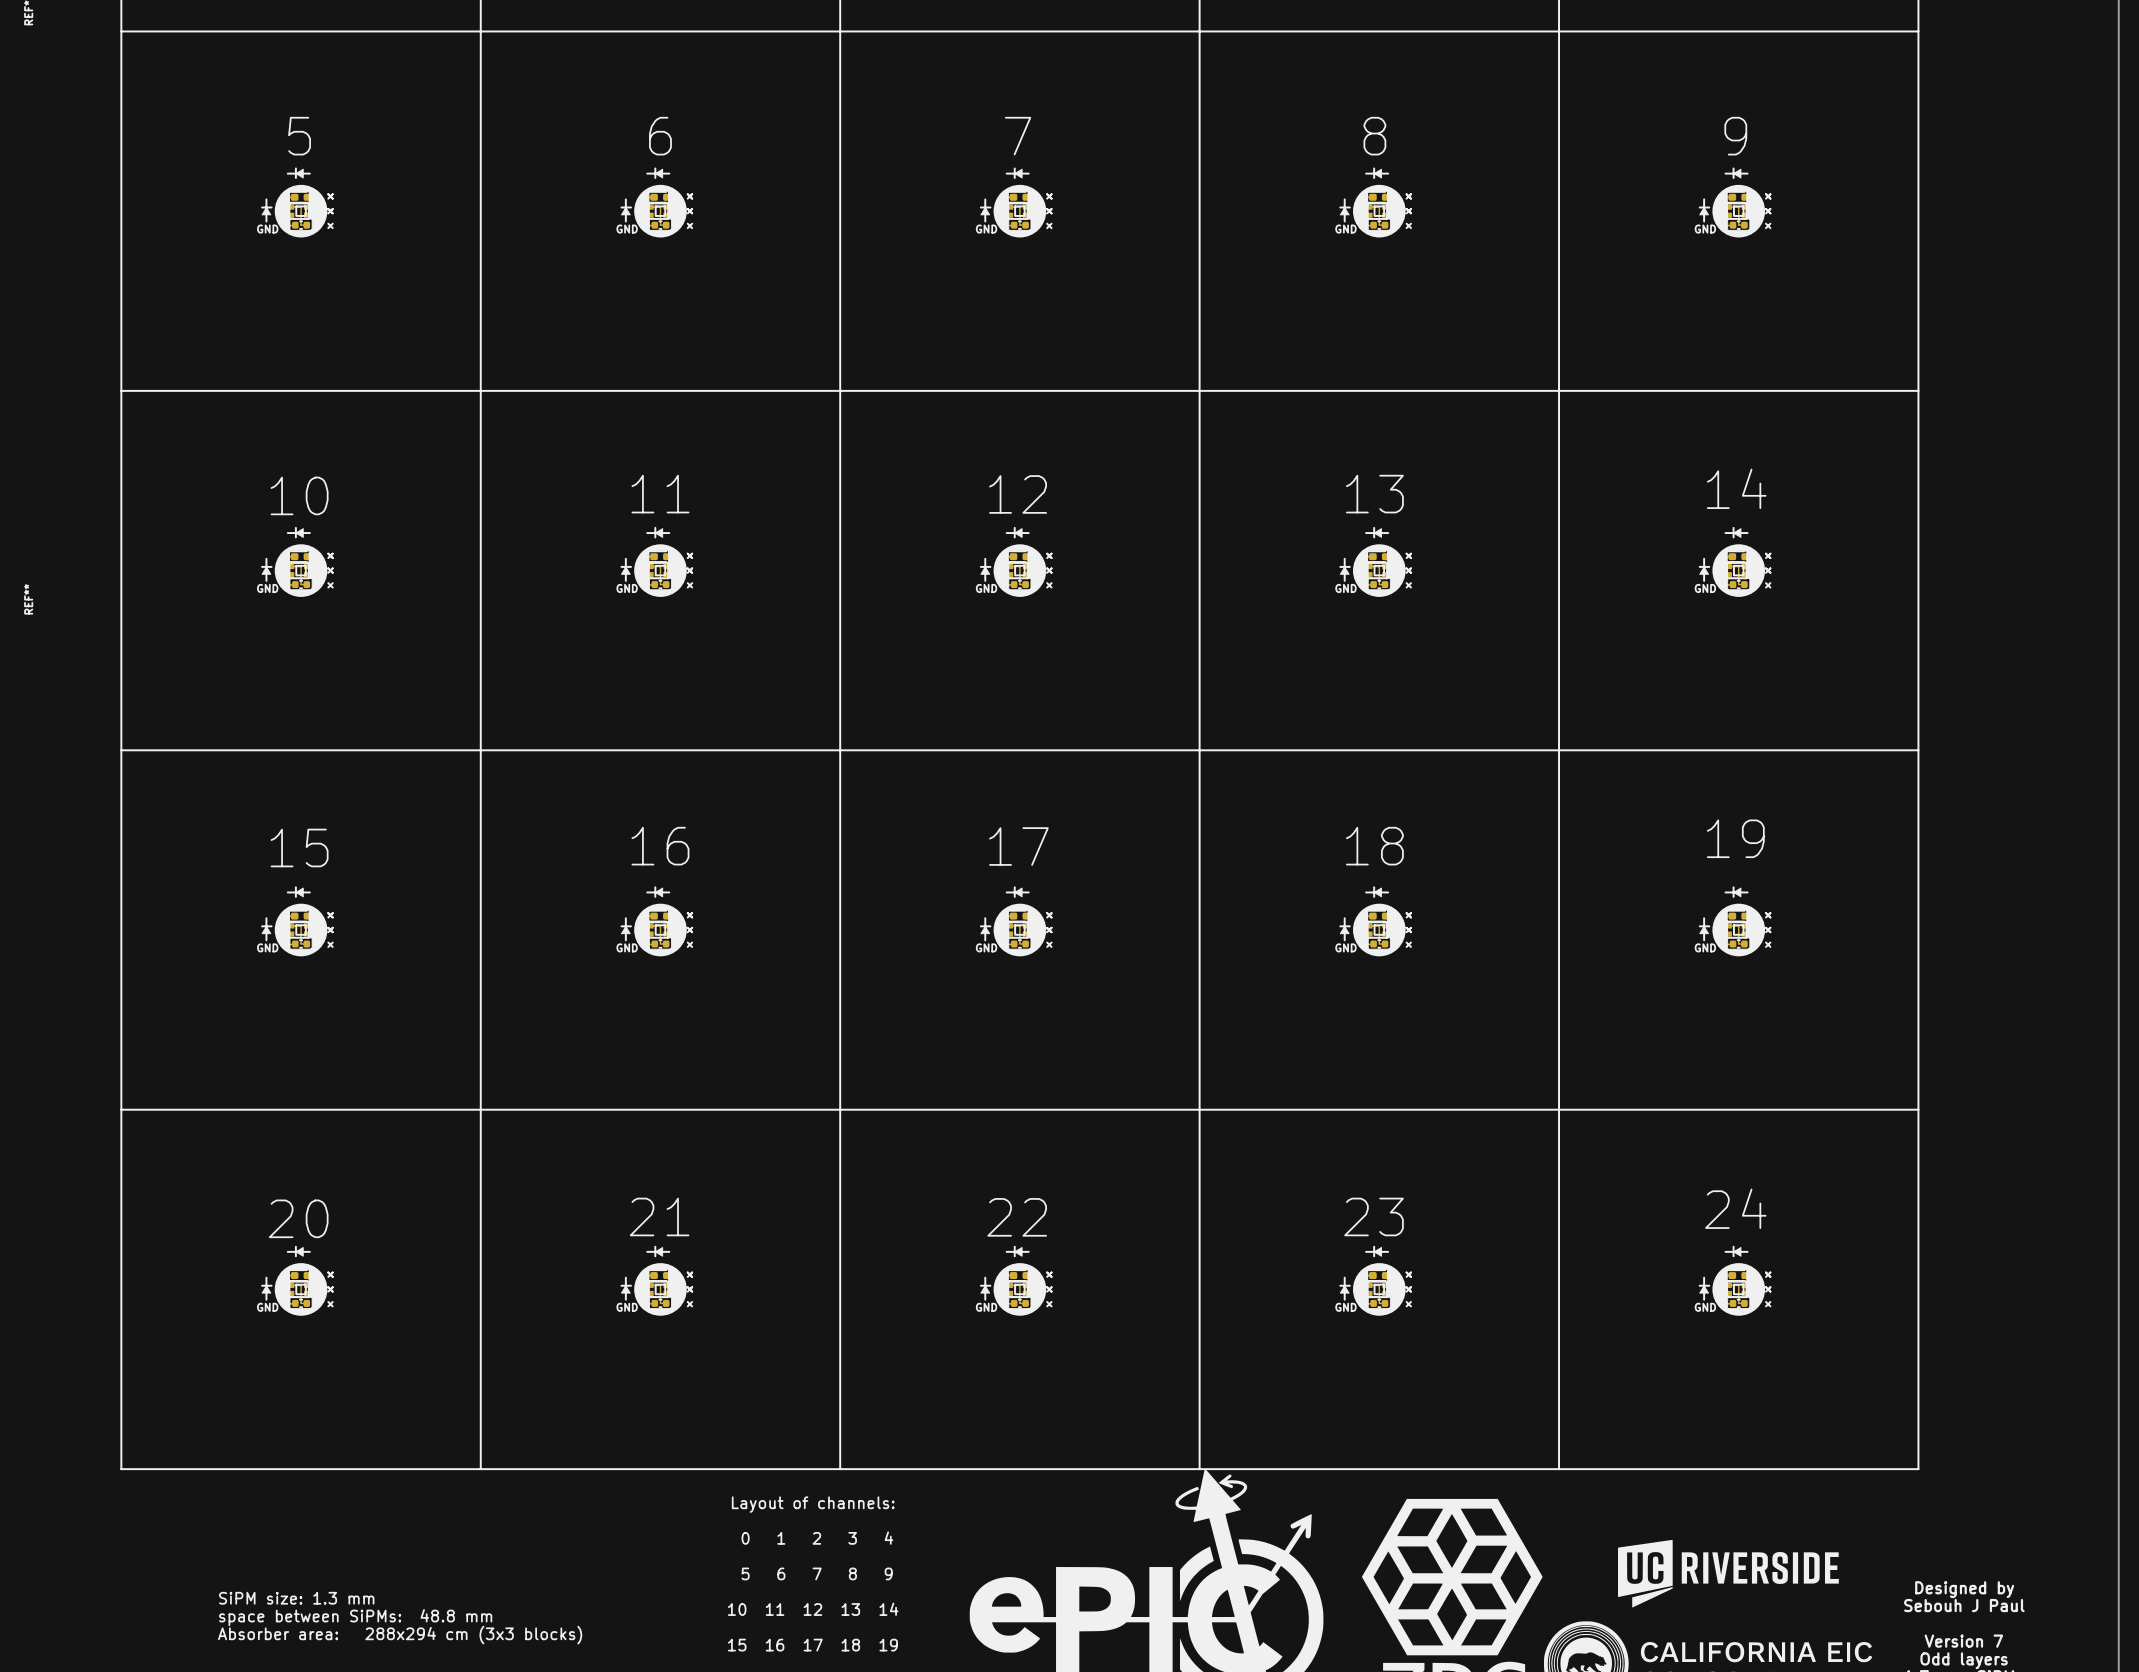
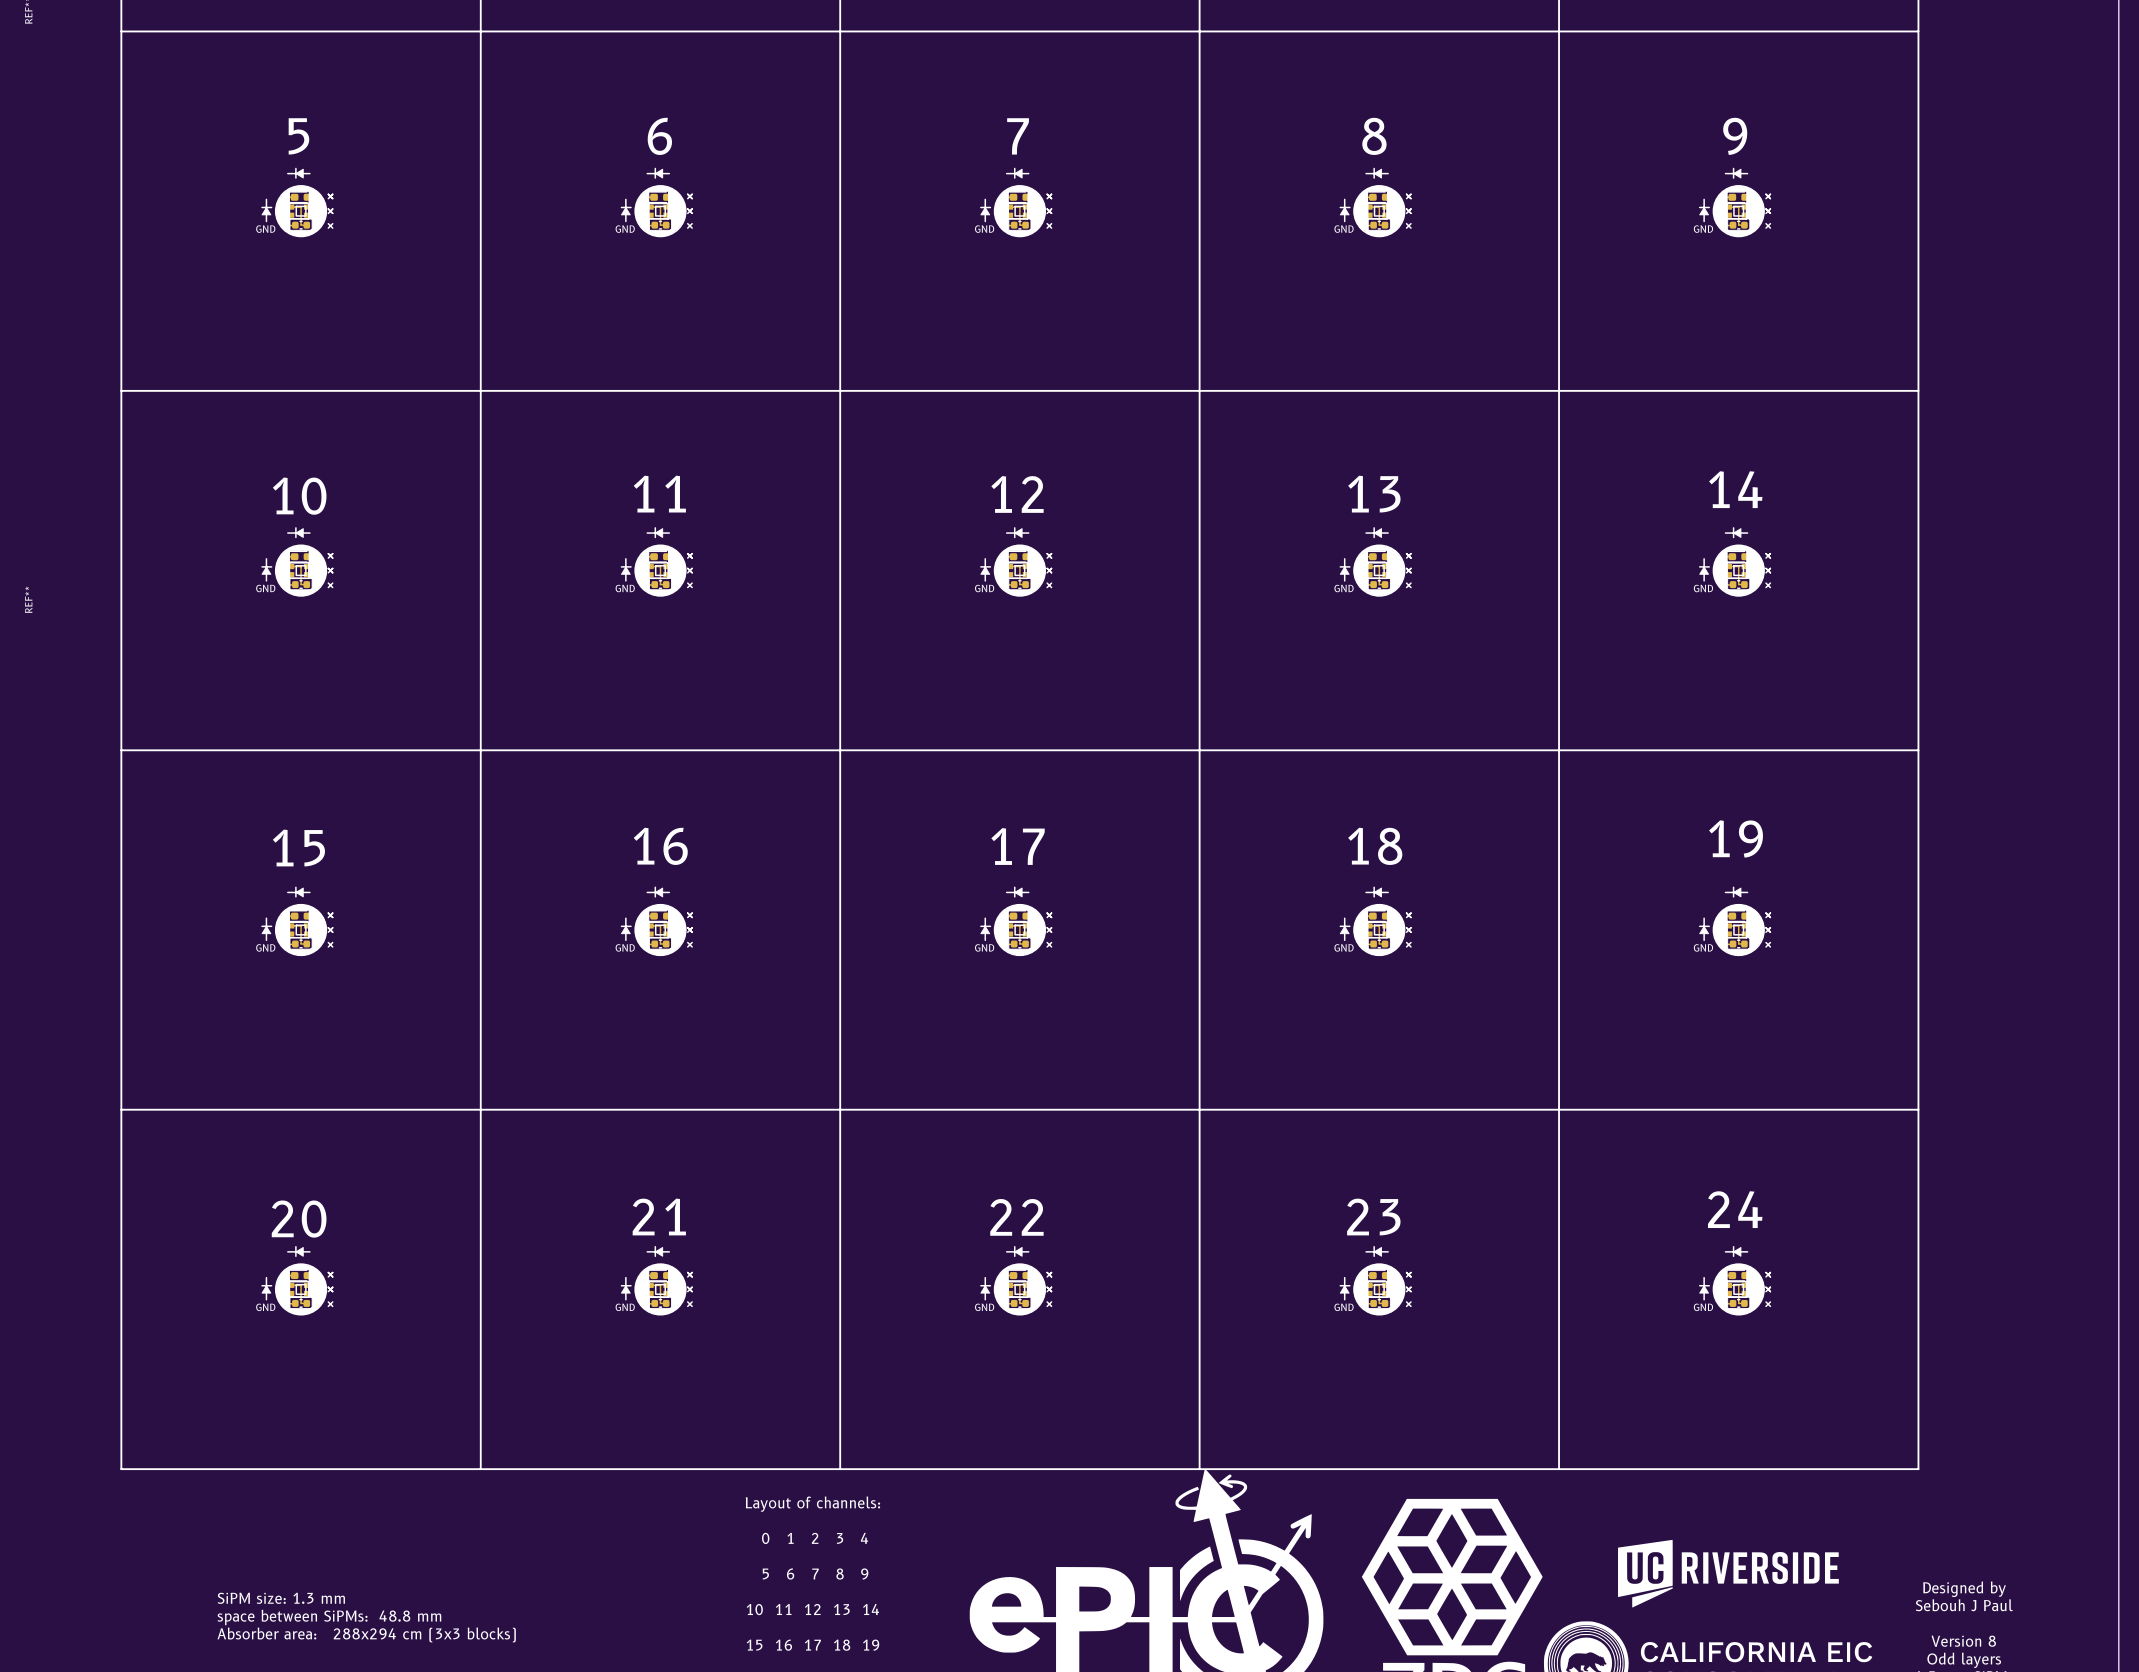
text: Version 7 (1963, 1641) -> Version 8 (1963, 1641)

